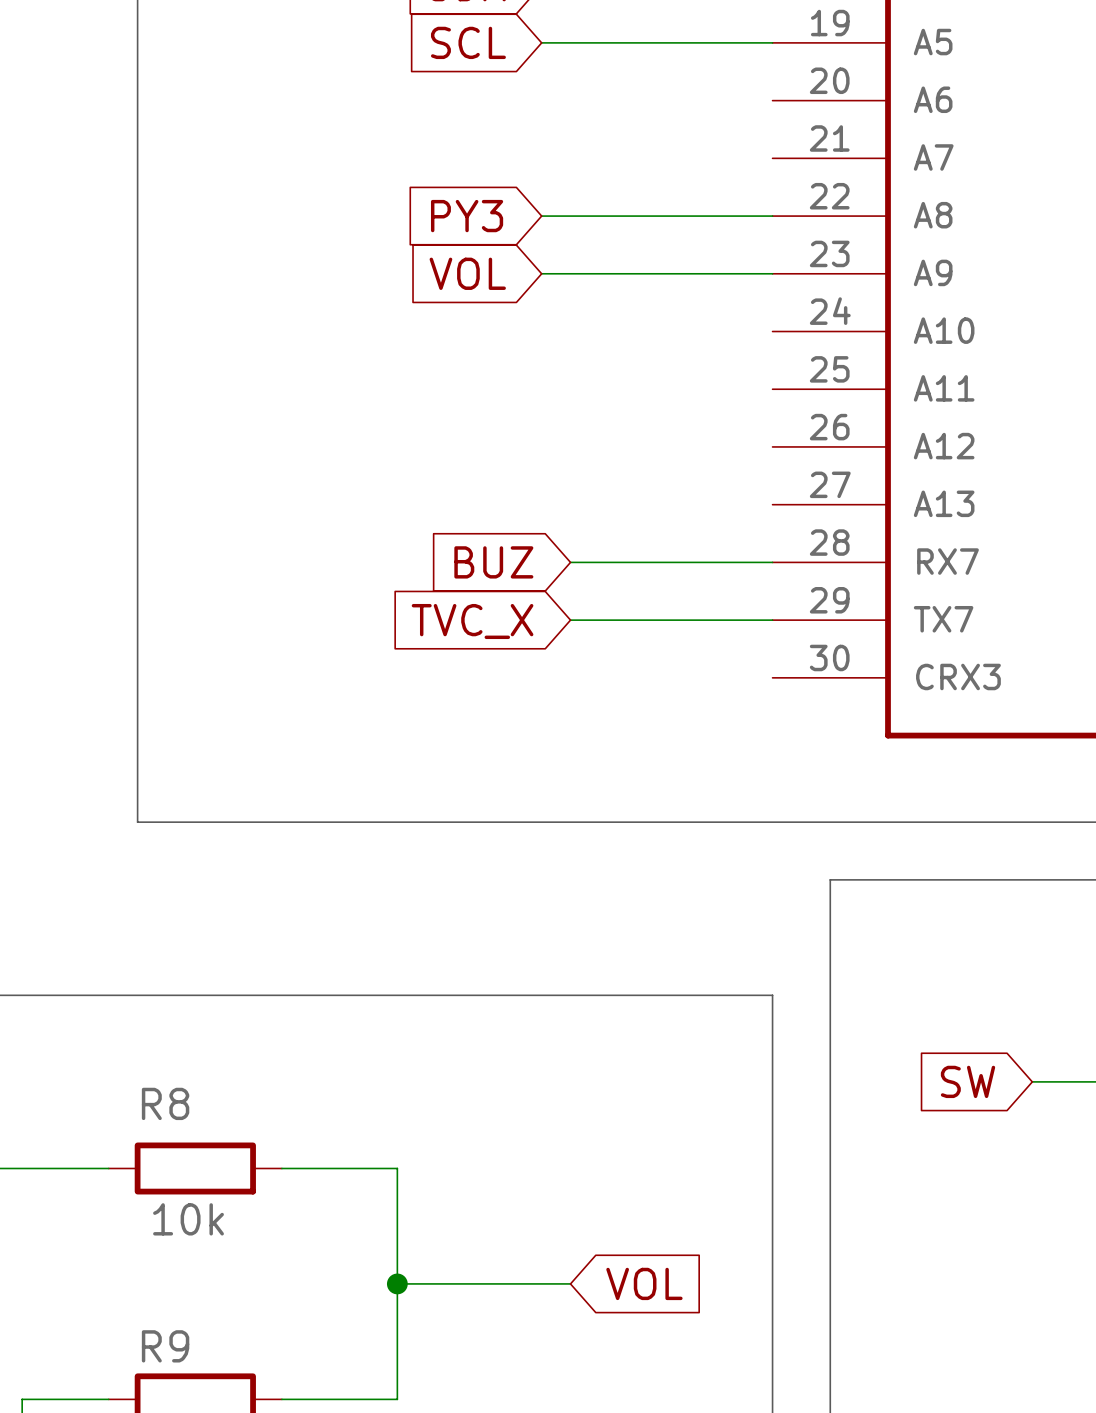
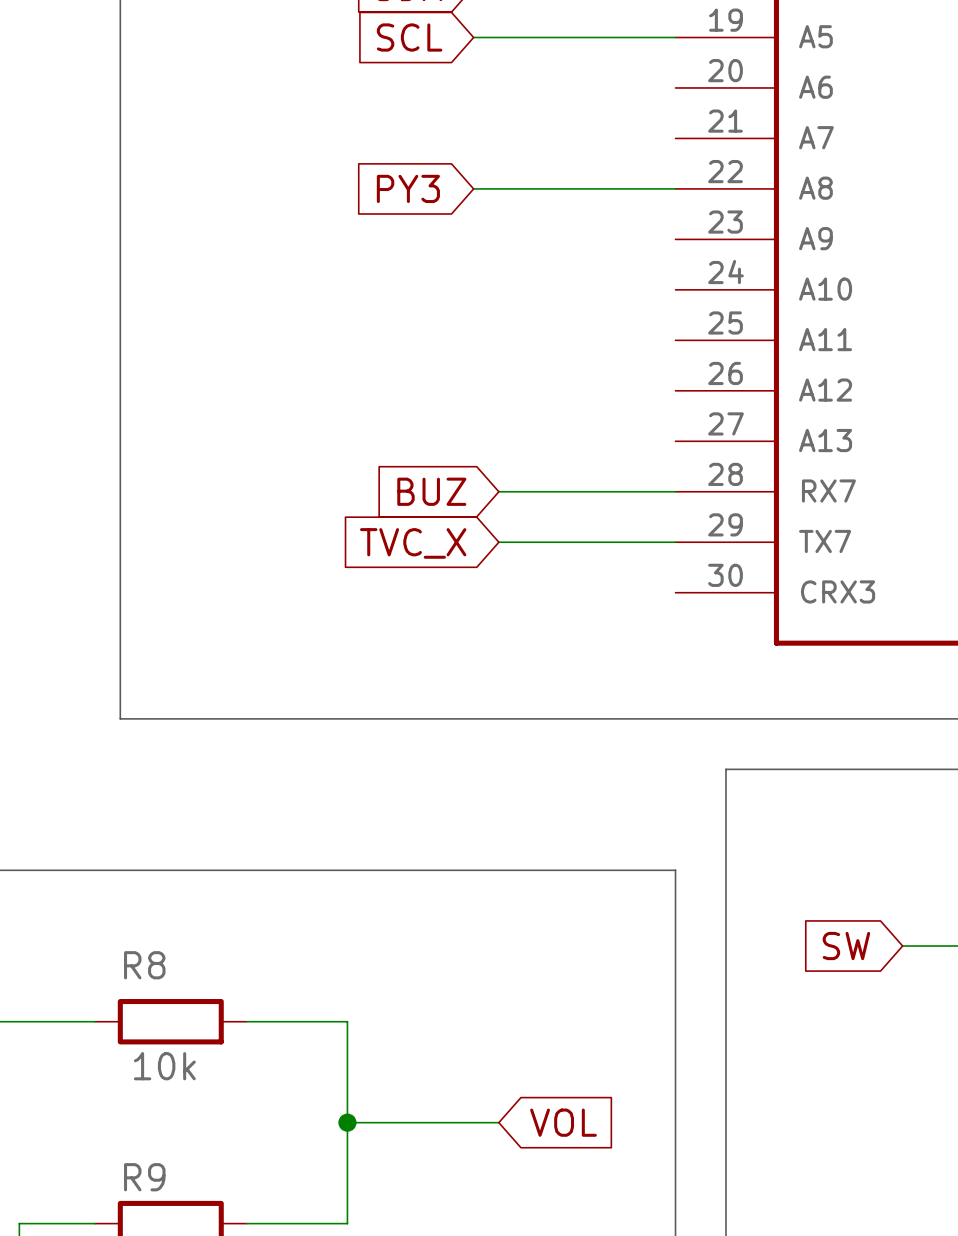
global label: VOL (467, 273) -> none
wire: (541, 273) (772, 273) -> none

